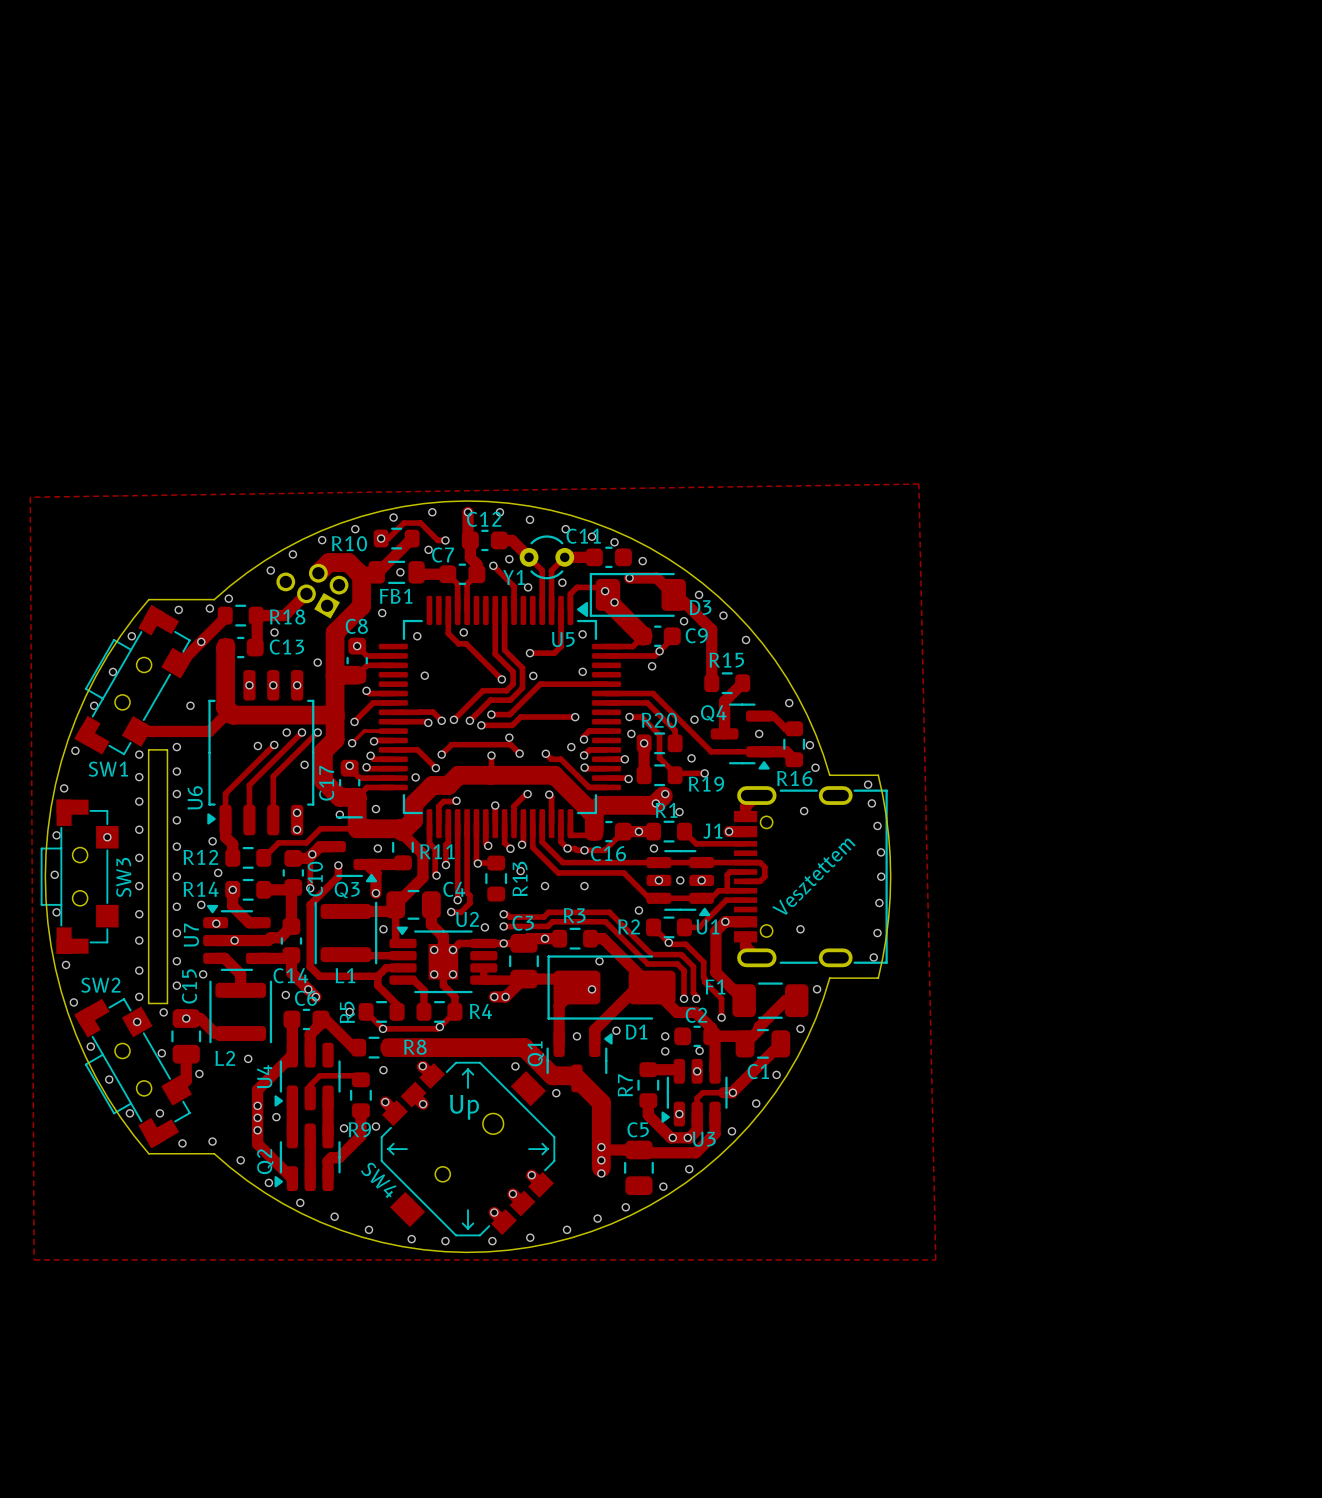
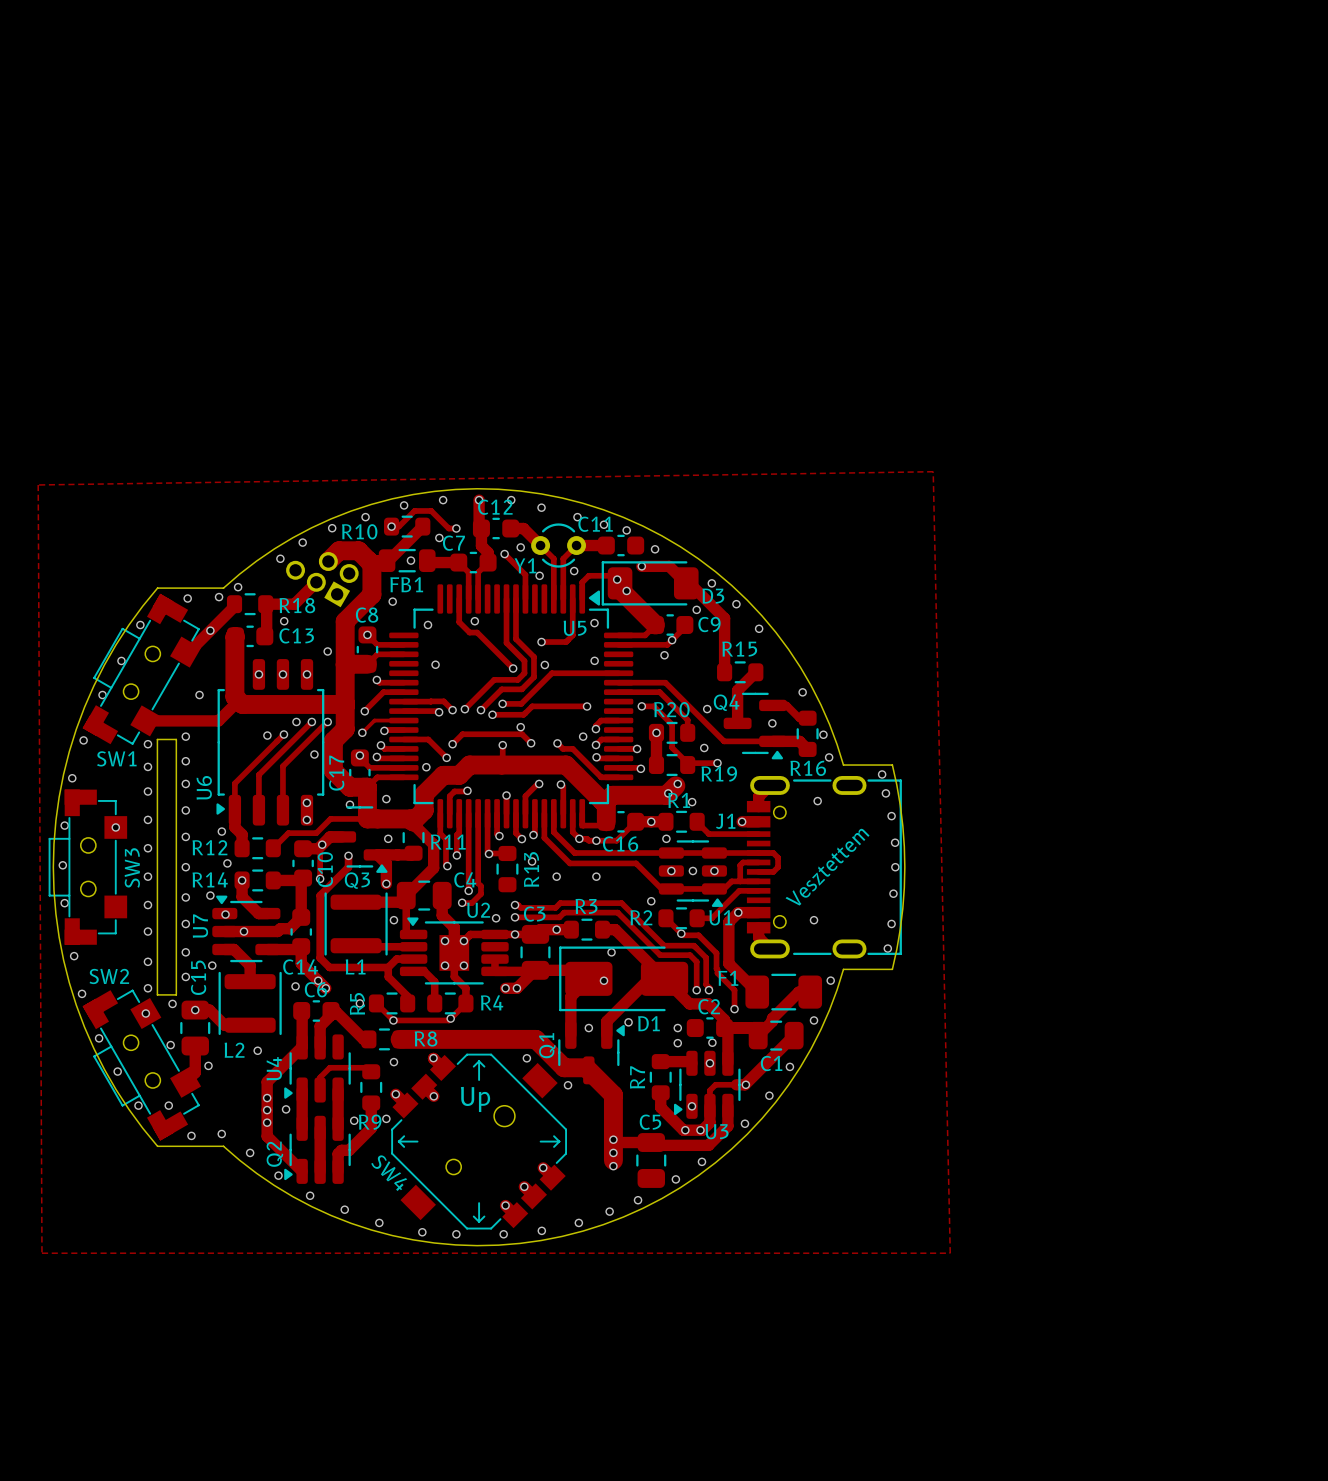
via: (631, 733) -> none

